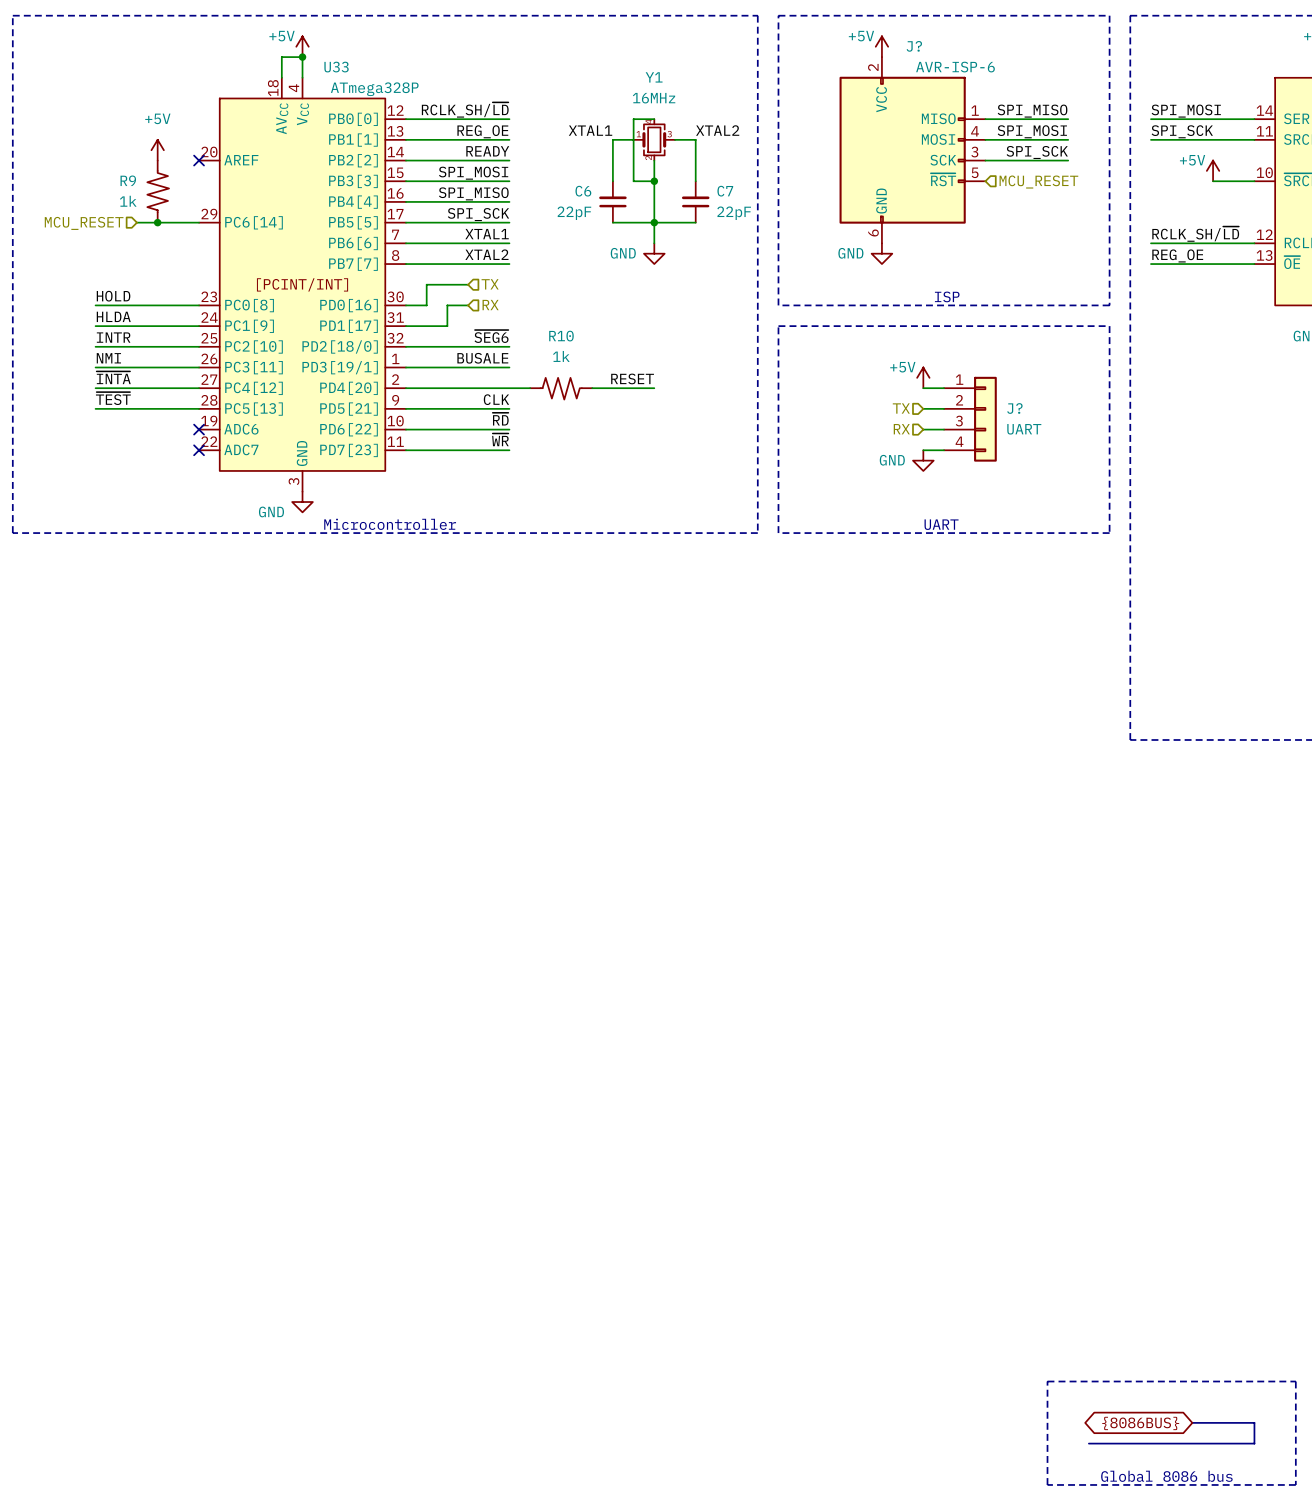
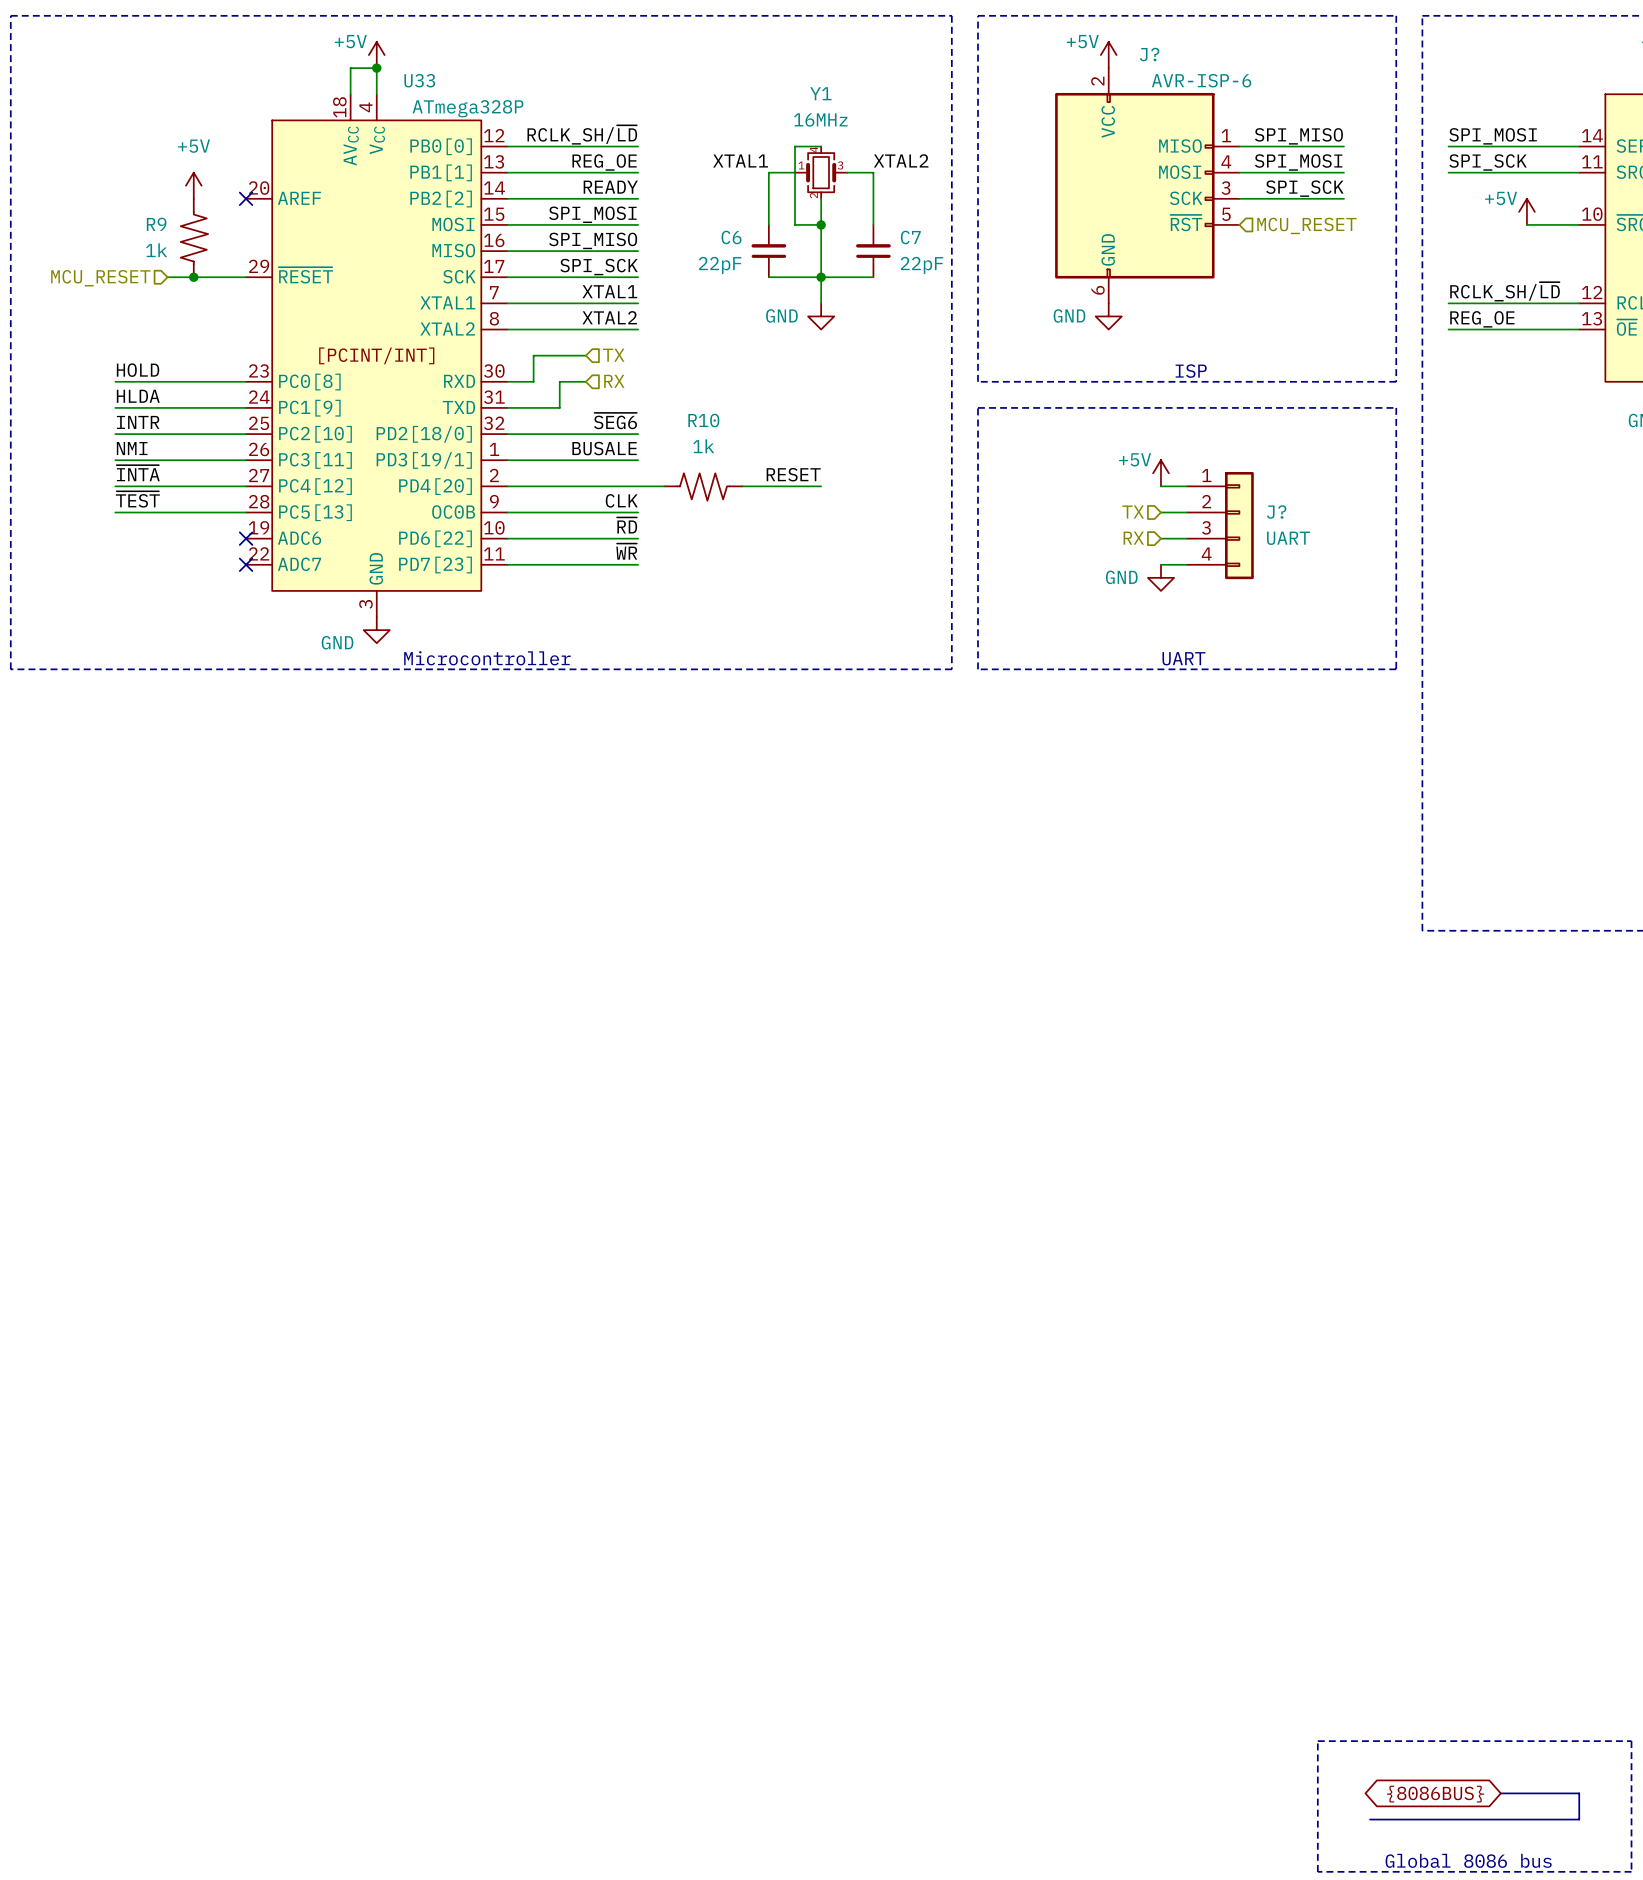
U33 symbol: [199, 77, 406, 492] -> [246, 94, 508, 618]

